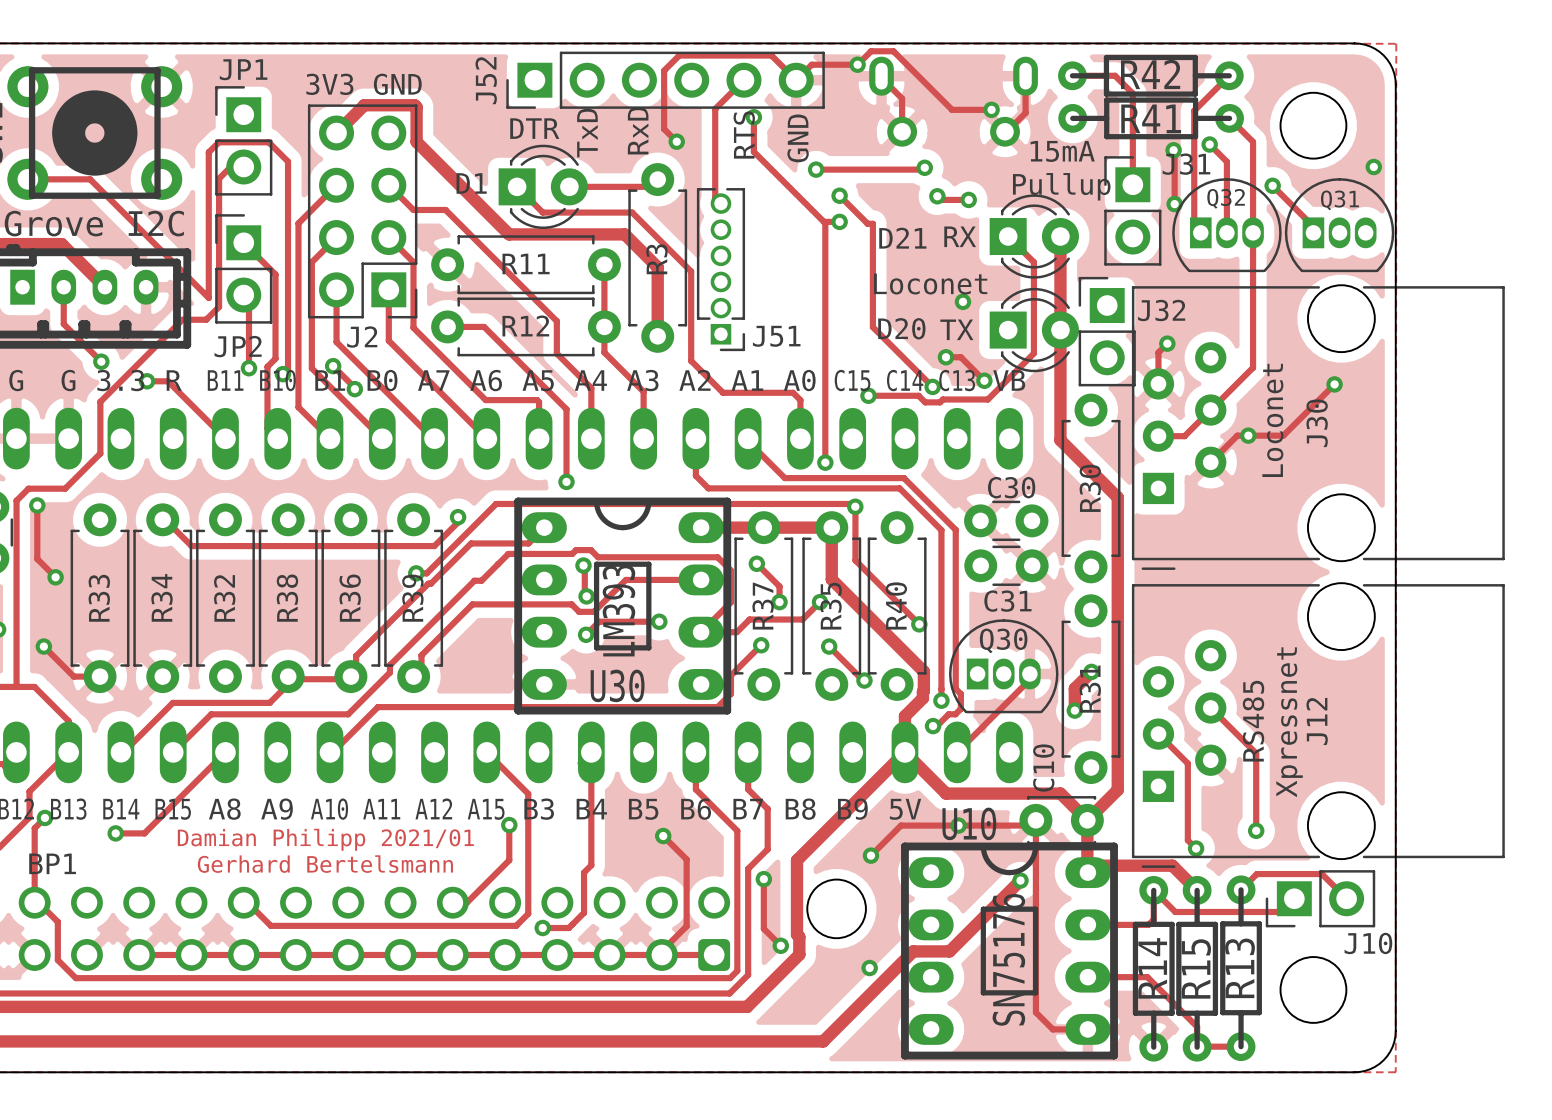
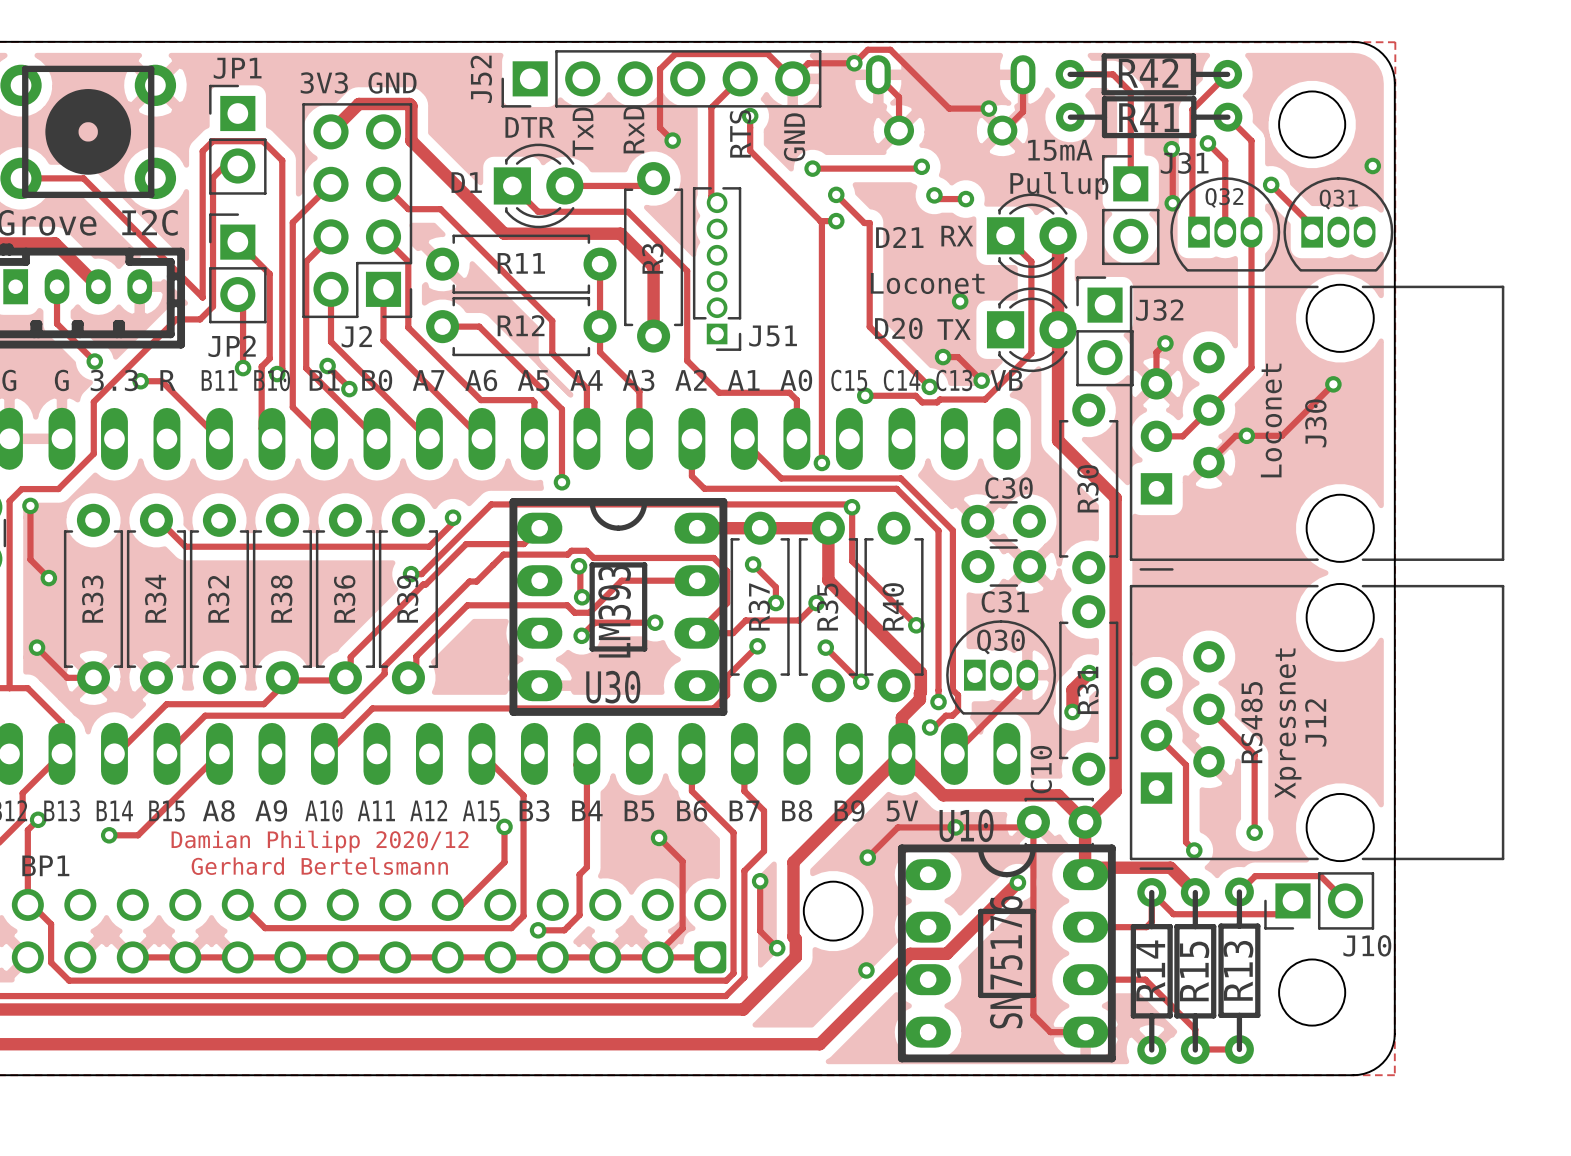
text: Damian Philipp 2021/01 (325, 839) -> Damian Philipp 2020/12 (320, 841)

